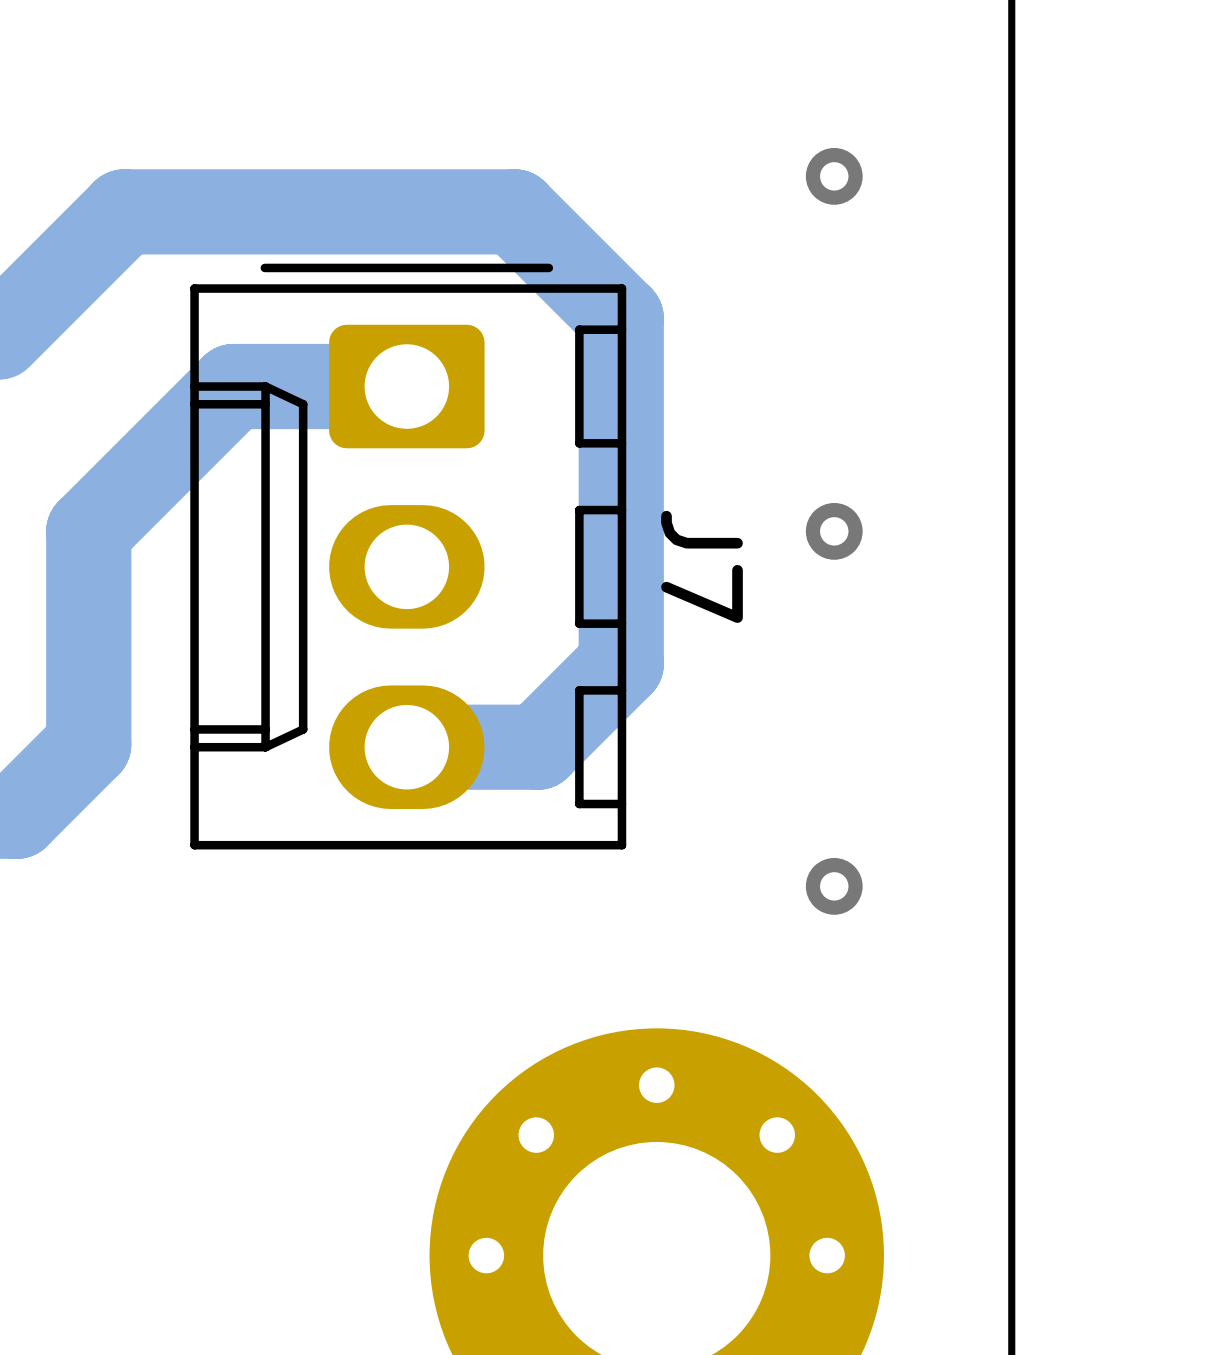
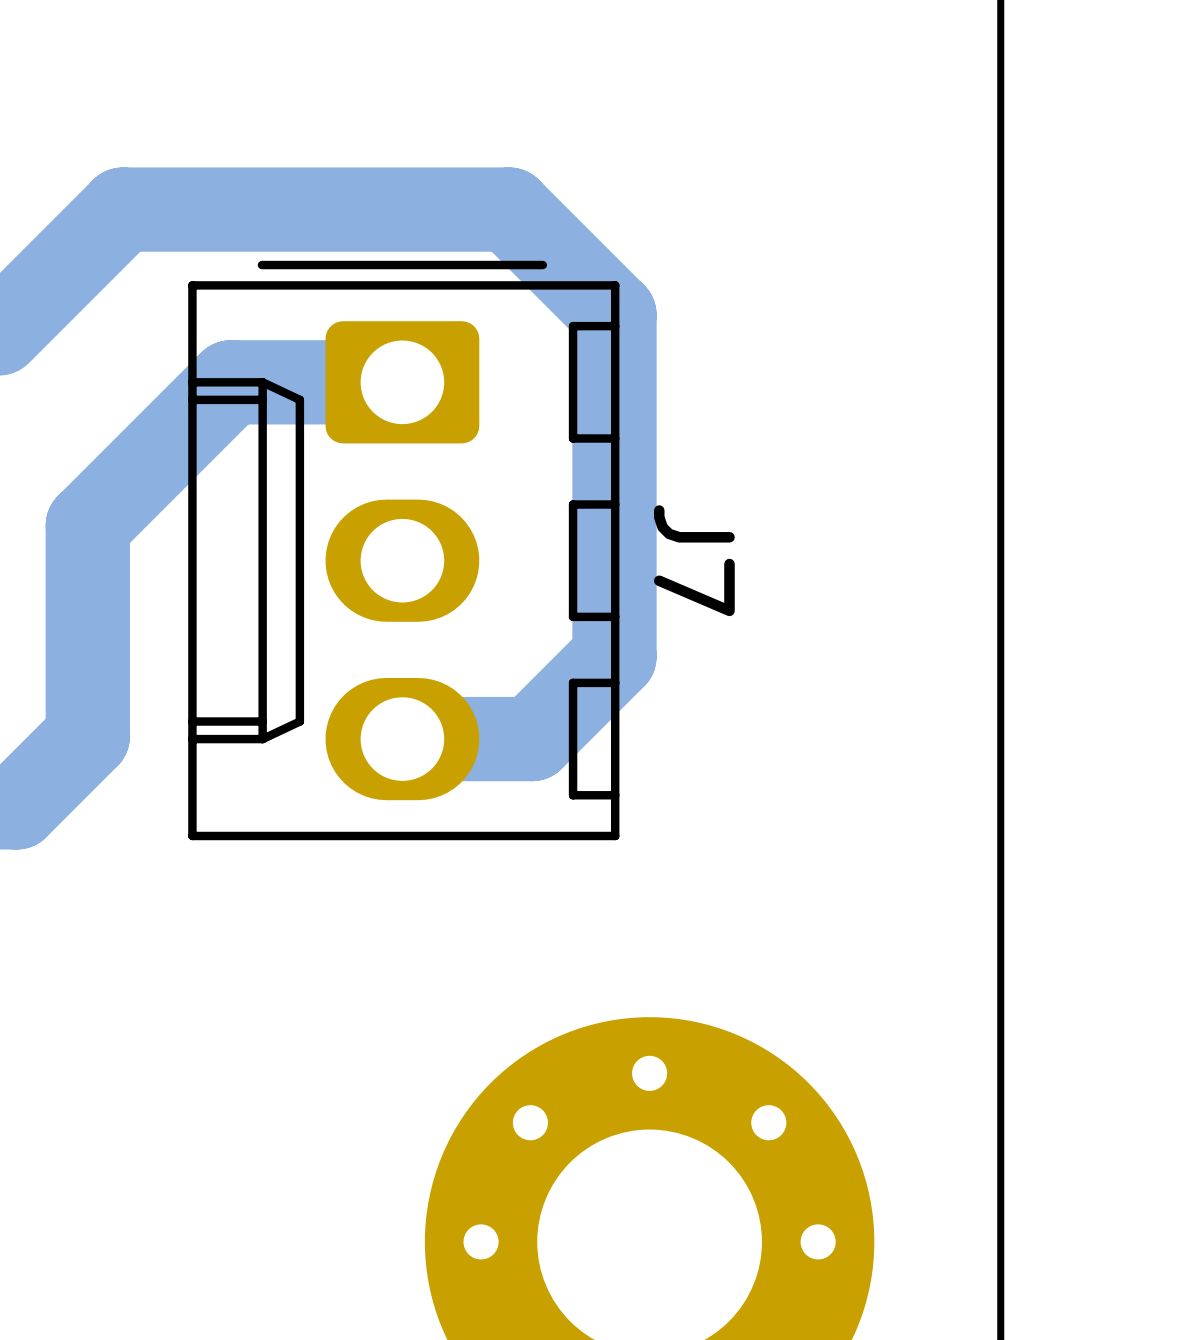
via: (834, 176) -> none
via: (834, 531) -> none
via: (834, 886) -> none

